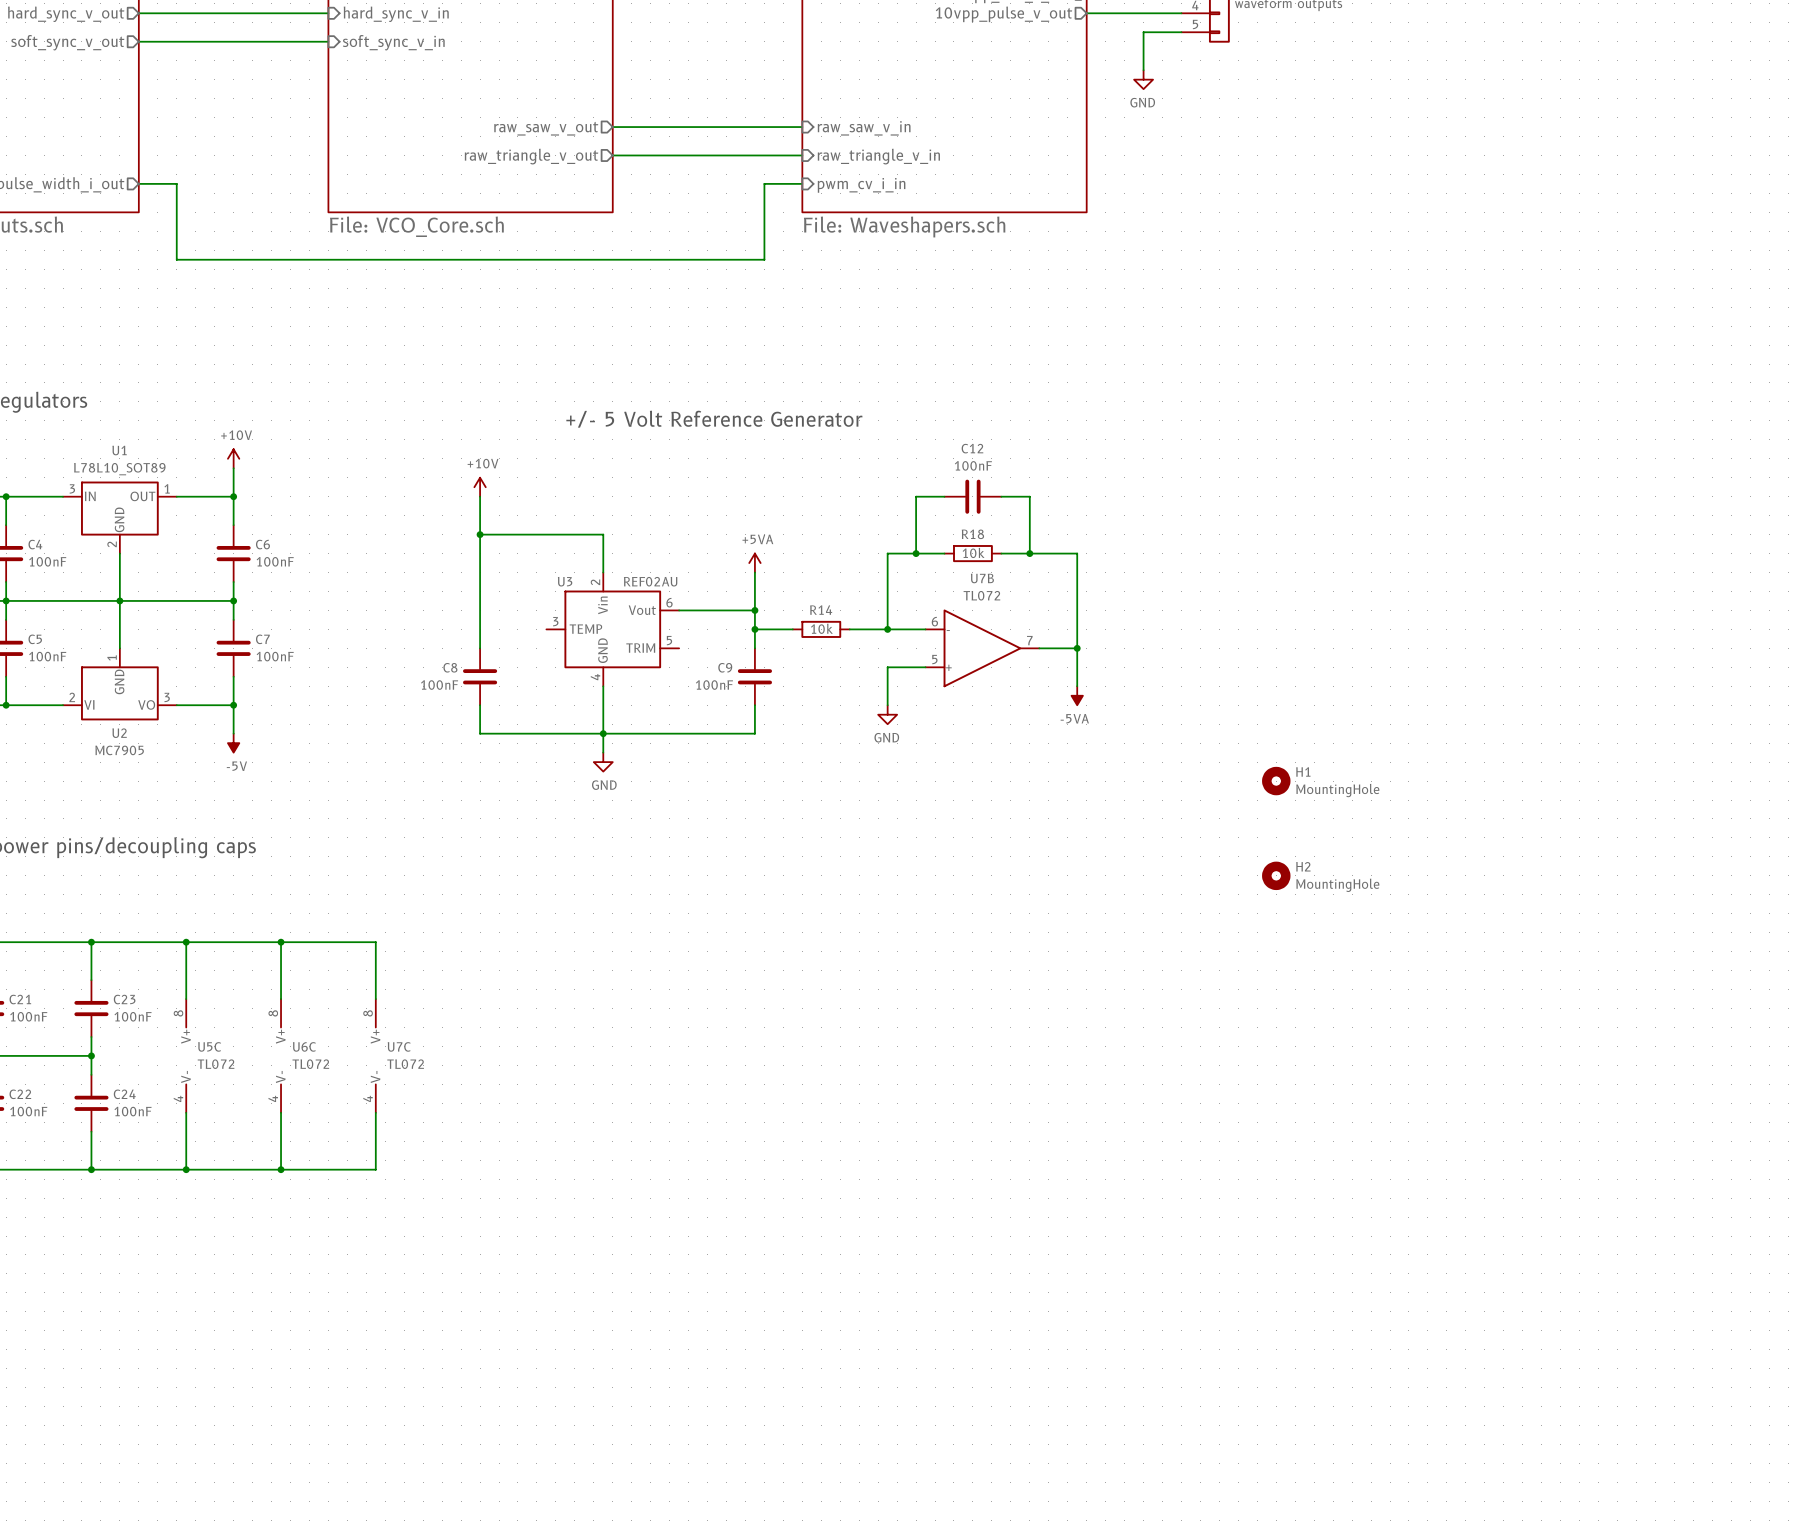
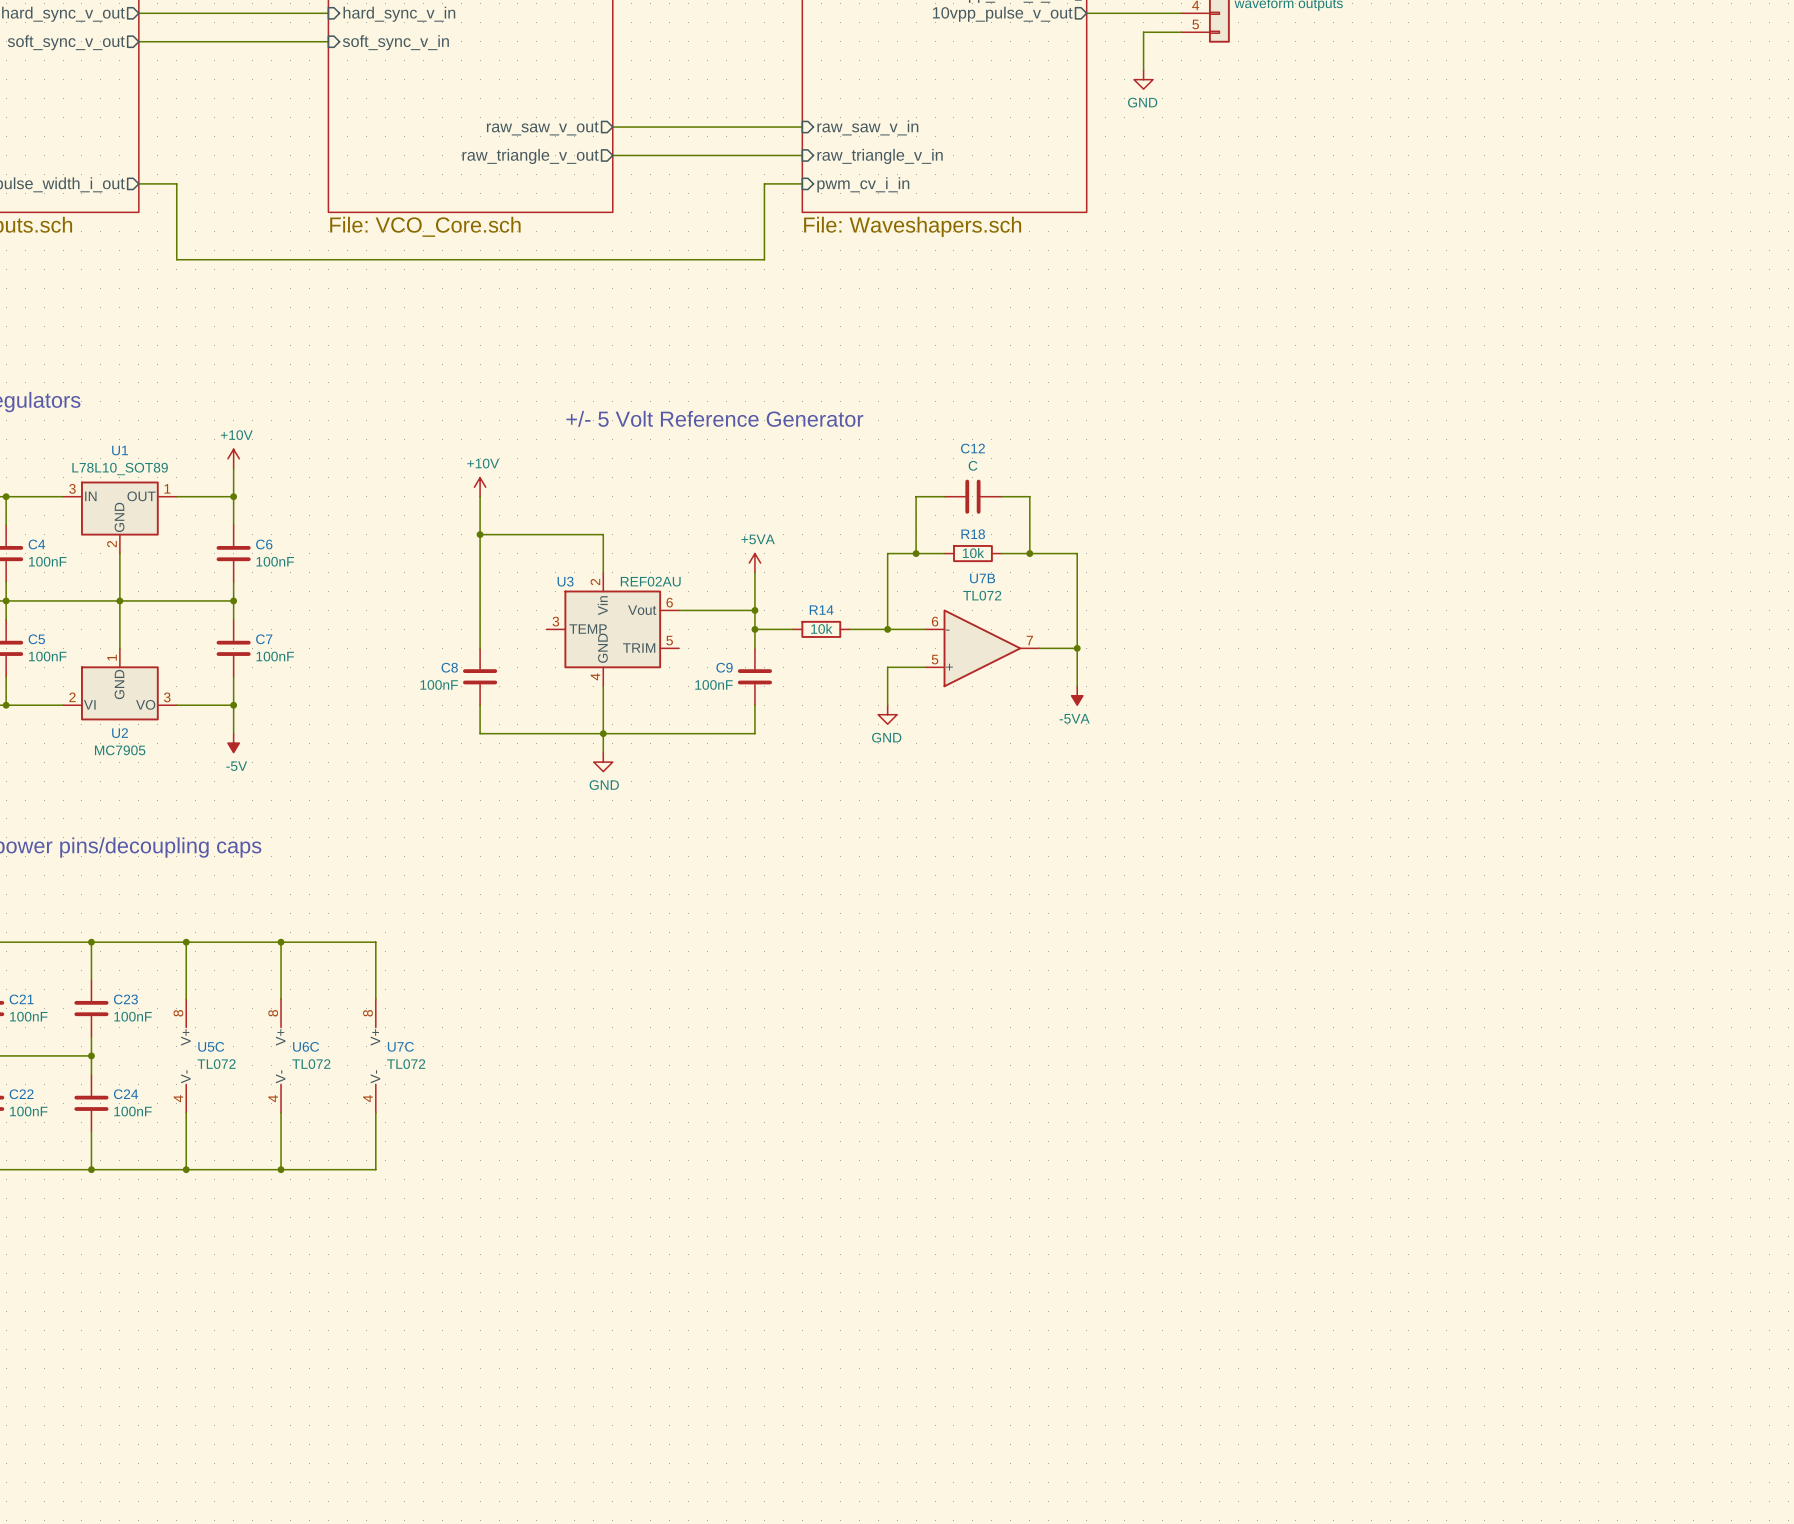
C12 value: 100nF (973, 465) -> C (973, 465)
H1: MountingHole (1276, 781) -> none
H2: MountingHole (1276, 875) -> none

